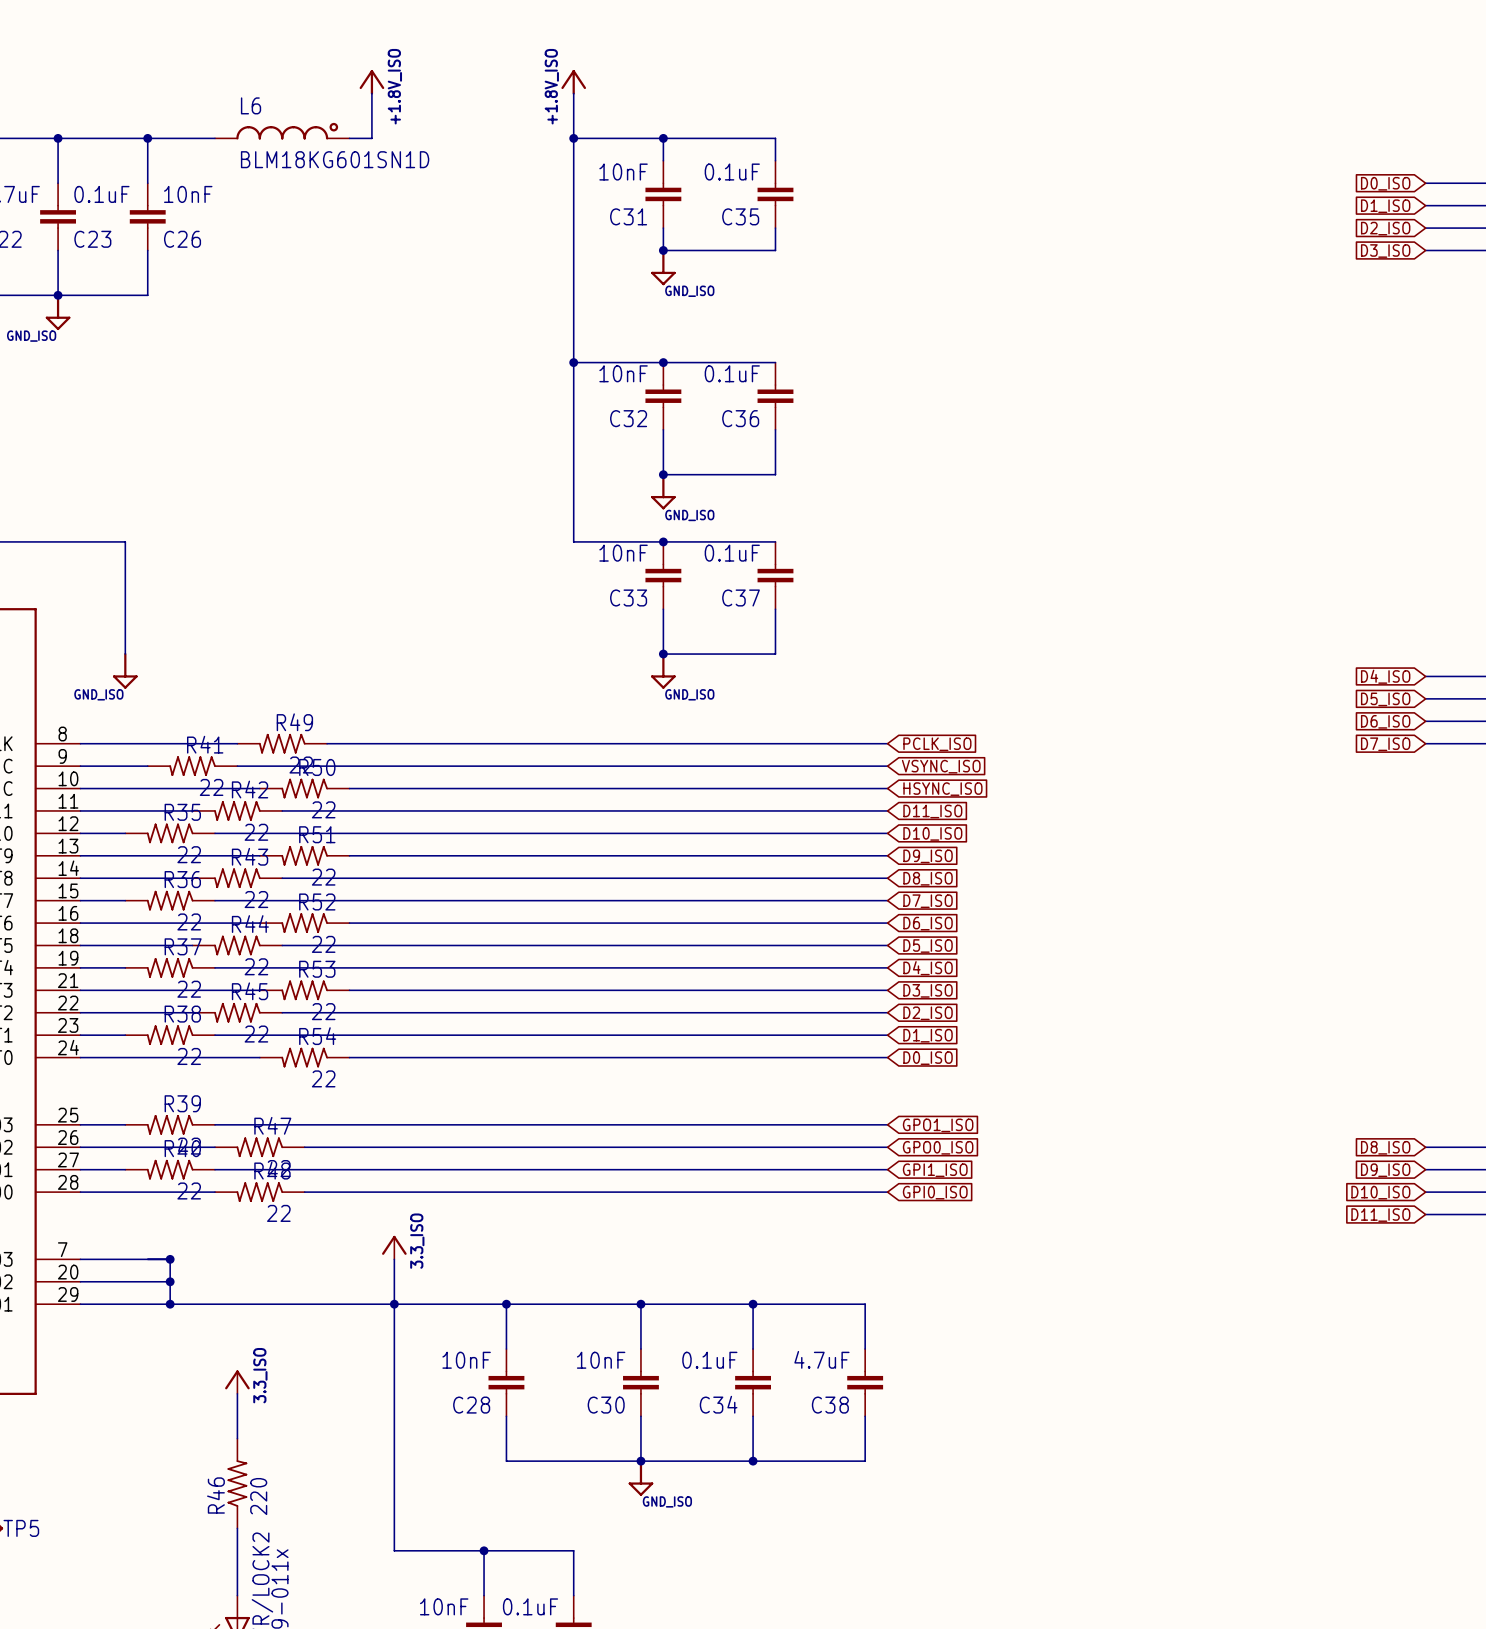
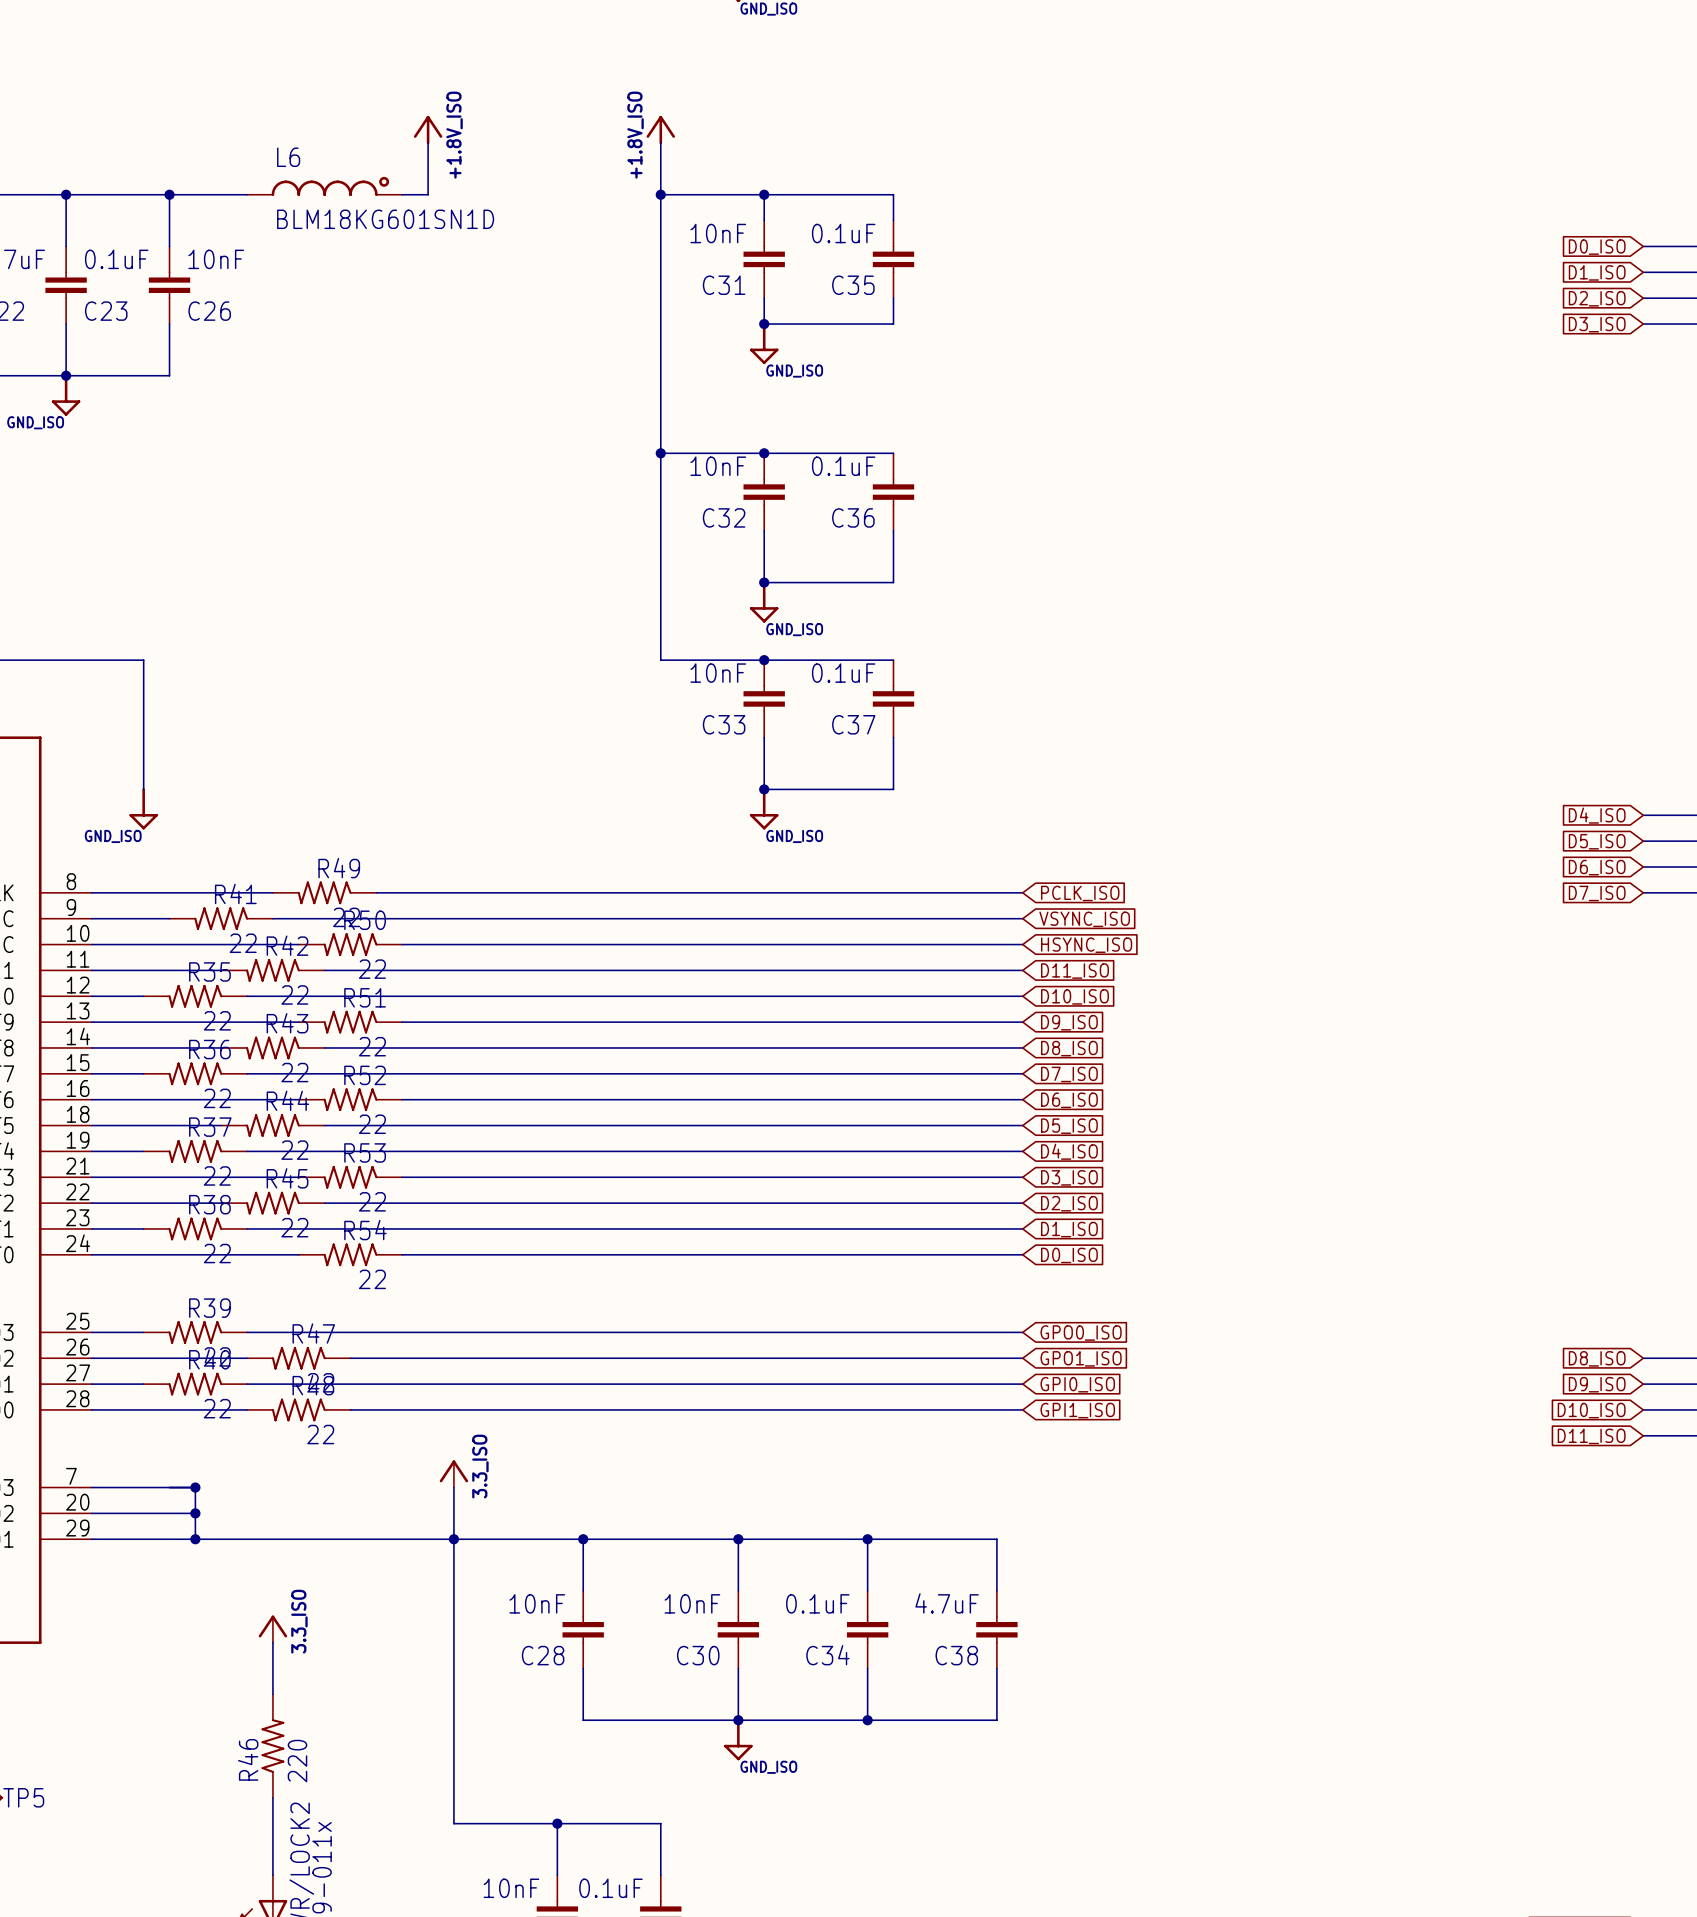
global label: GPO1_ISO (938, 1125) -> GPO0_ISO (1081, 1333)
global label: GPO0_ISO (938, 1147) -> GPO1_ISO (1081, 1358)
global label: GPI1_ISO (935, 1170) -> GPI0_ISO (1077, 1384)
global label: GPI0_ISO (935, 1192) -> GPI1_ISO (1077, 1410)

